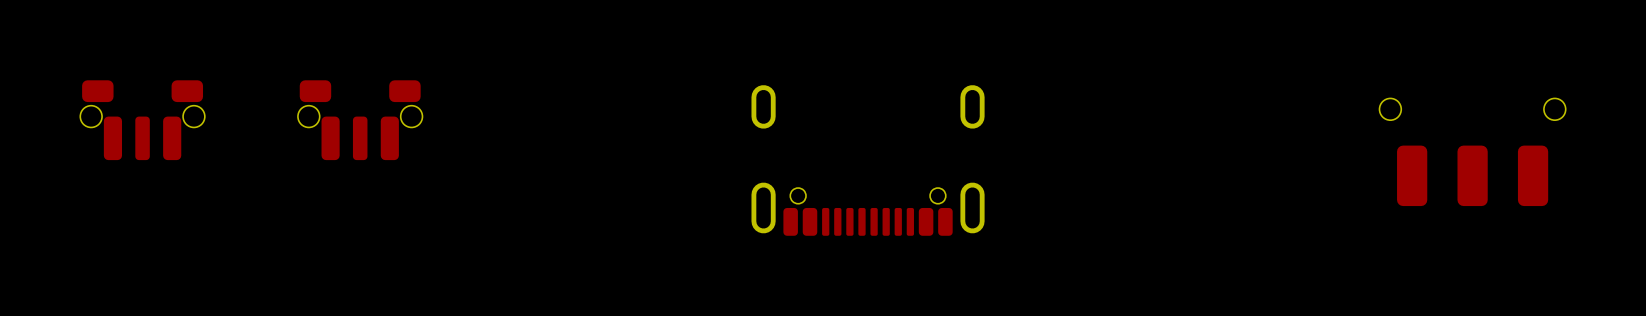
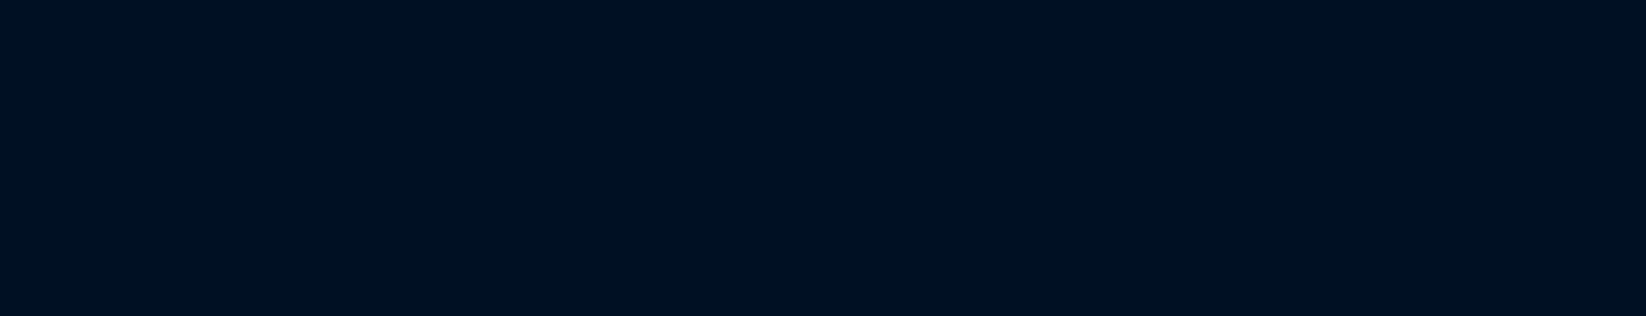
part: (142, 120) -> none
part: (360, 120) -> none
part: (1472, 152) -> none
part: (868, 160) -> none

